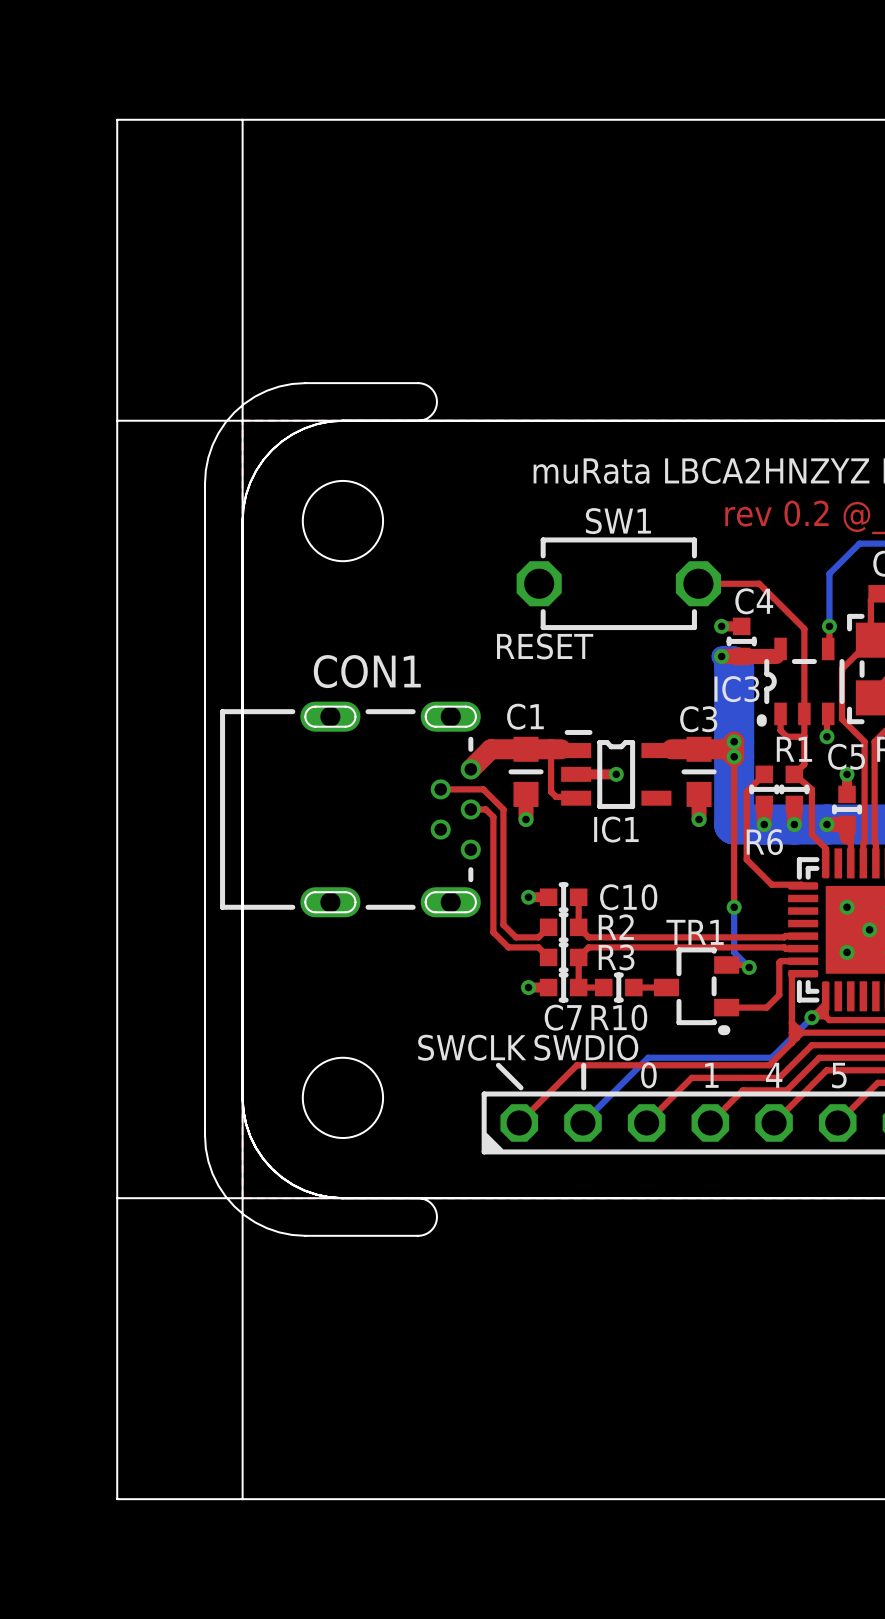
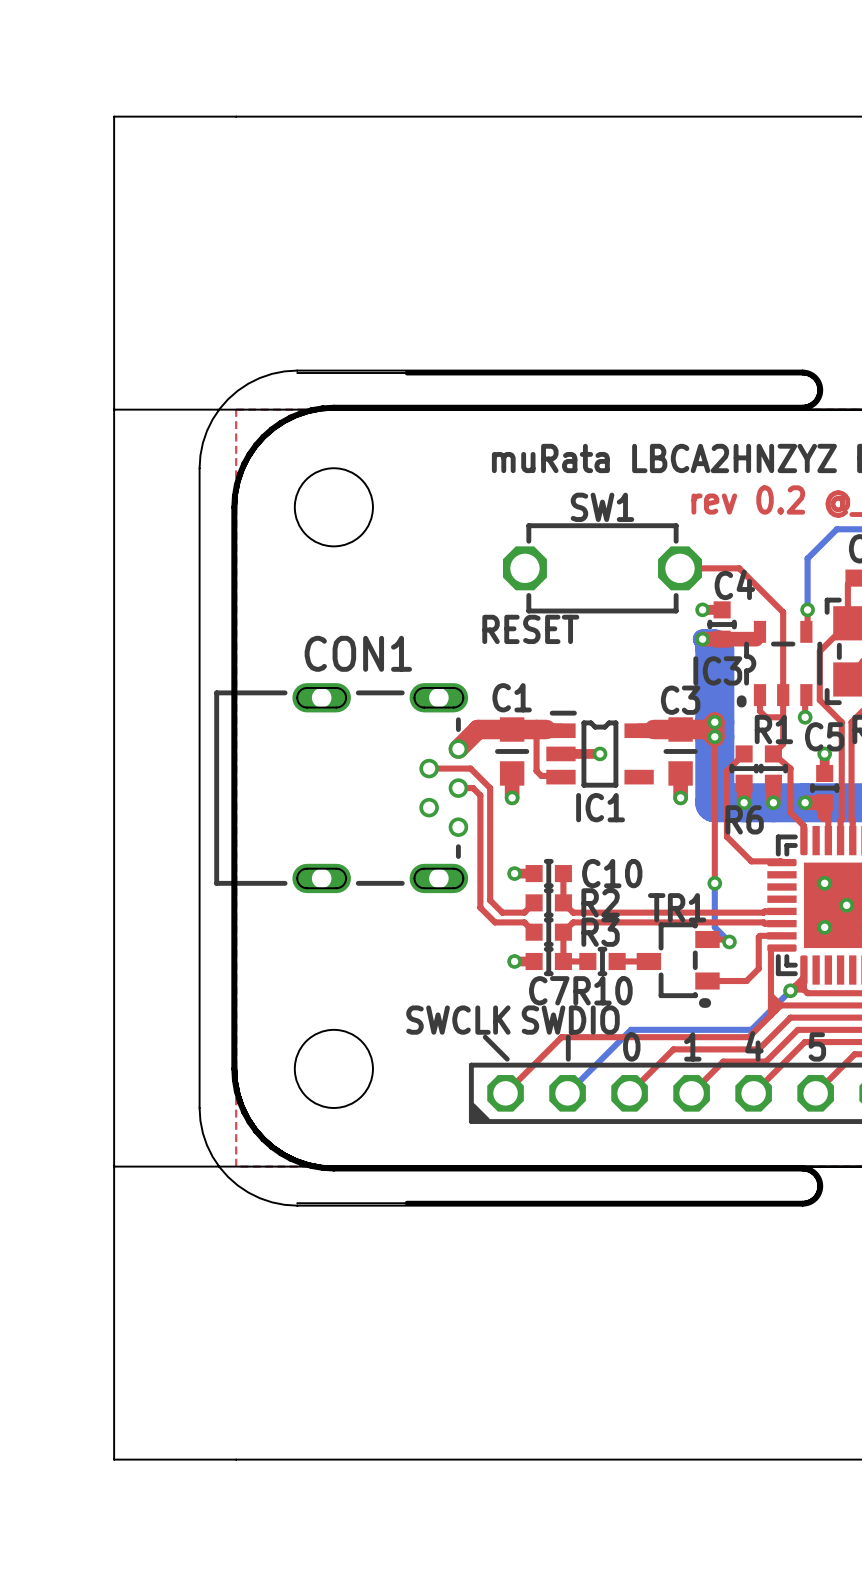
board edge: (242, 119) (242, 521) -> none
board edge: (305, 383) (292, 383) (266, 390) (255, 396) (234, 412) (218, 433) (212, 445) (205, 470) (204, 483) -> (802, 409) (816, 403) (822, 392) (818, 378) (805, 370) (284, 371) (271, 373) (248, 383) (228, 399) (219, 408) (212, 419) (202, 442) (199, 470)
board edge: (418, 383) (431, 388) (436, 401) (431, 415) (418, 420) -> (407, 373) (802, 373) (814, 378) (819, 390) (814, 402) (802, 407) (322, 407) (300, 412) (280, 422) (255, 444) (243, 463) (236, 485) (233, 507) (233, 1068) (239, 1101) (255, 1131) (280, 1153) (300, 1163) (322, 1168) (802, 1169) (814, 1174) (819, 1186) (814, 1198) (802, 1203) (407, 1203)
board edge: (242, 1097) (242, 1499) -> none
board edge: (204, 1135) (205, 1148) (212, 1173) (218, 1185) (234, 1206) (255, 1222) (266, 1228) (292, 1234) (305, 1235) -> (199, 1105) (202, 1133) (212, 1156) (219, 1167) (228, 1177) (248, 1192) (271, 1202) (284, 1204) (805, 1205) (818, 1198) (822, 1183) (816, 1172) (802, 1166)
board edge: (418, 1198) (431, 1203) (436, 1217) (431, 1230) (418, 1235) -> none

